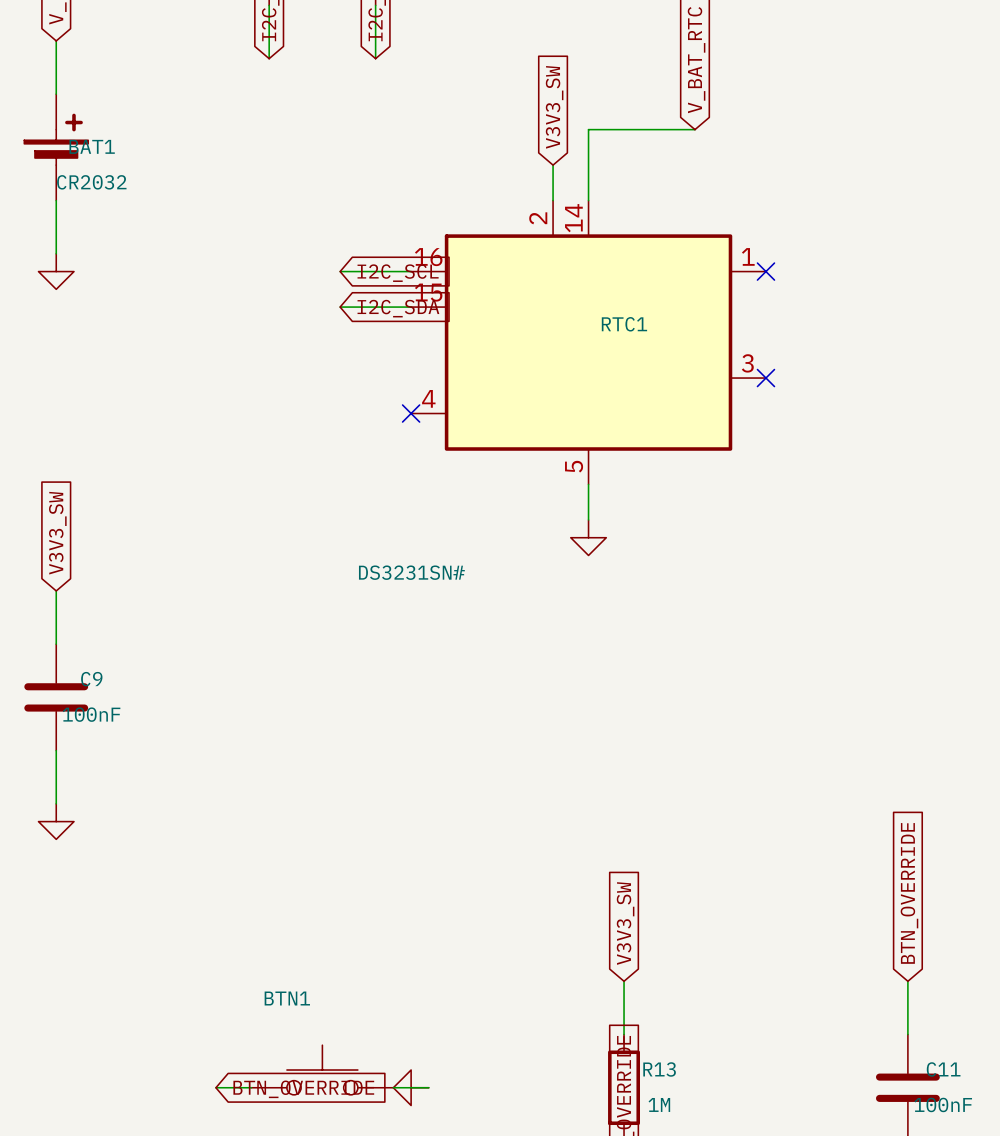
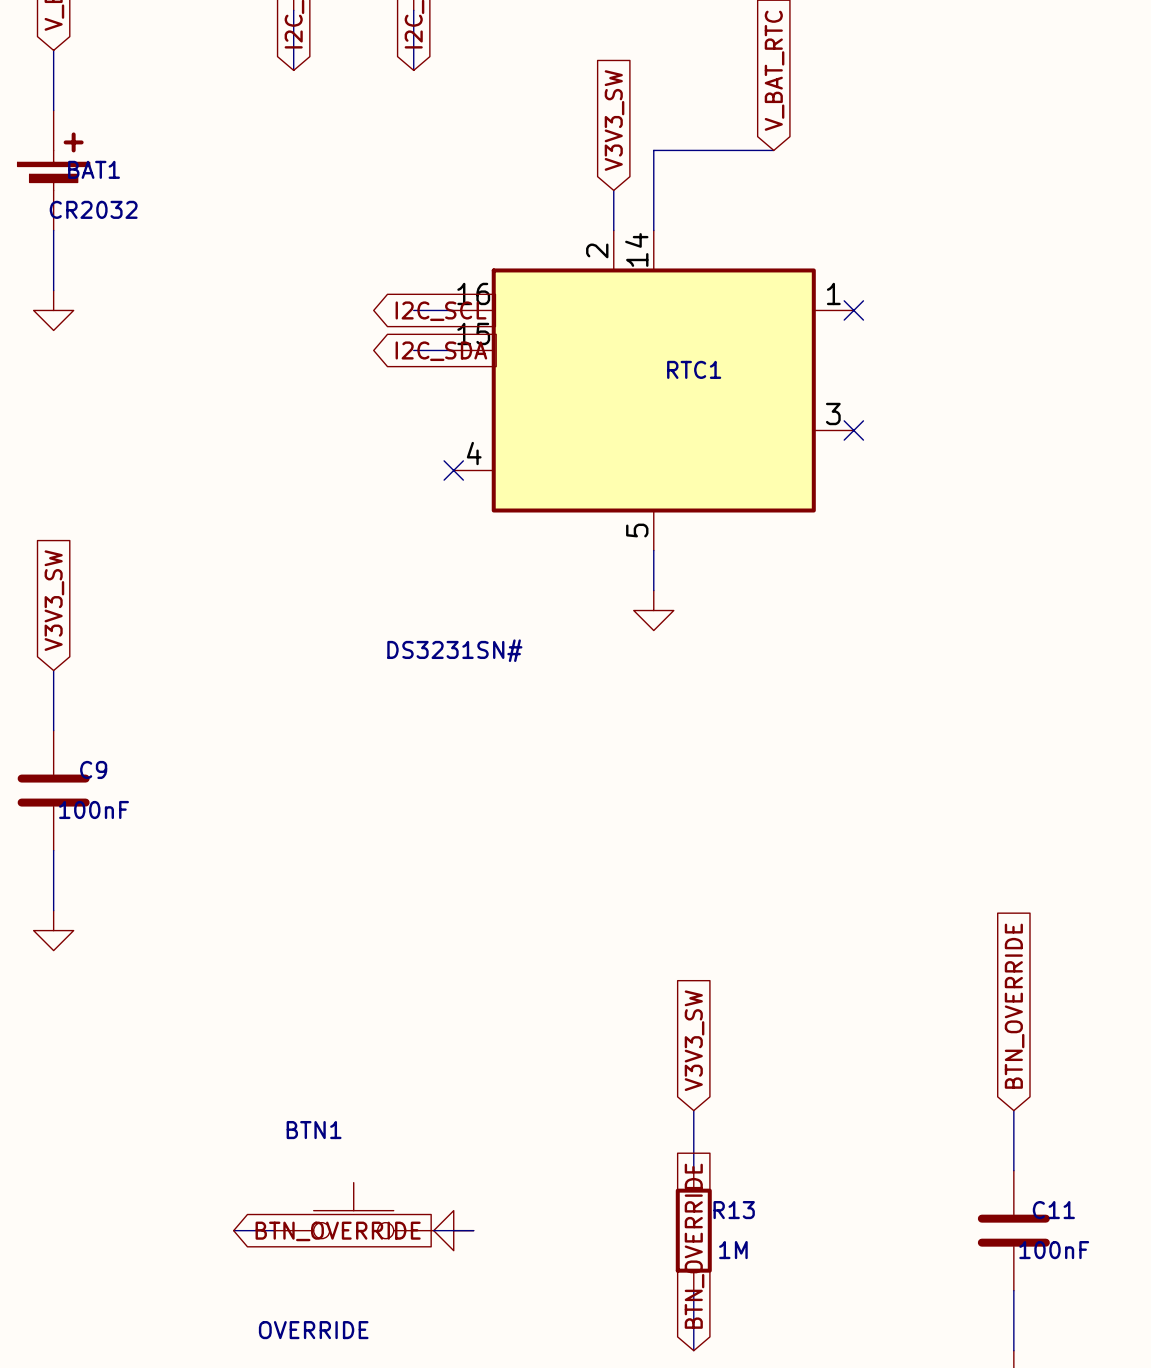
wire: (340, 271) (375, 271) -> none
wire: (340, 307) (375, 307) -> none

